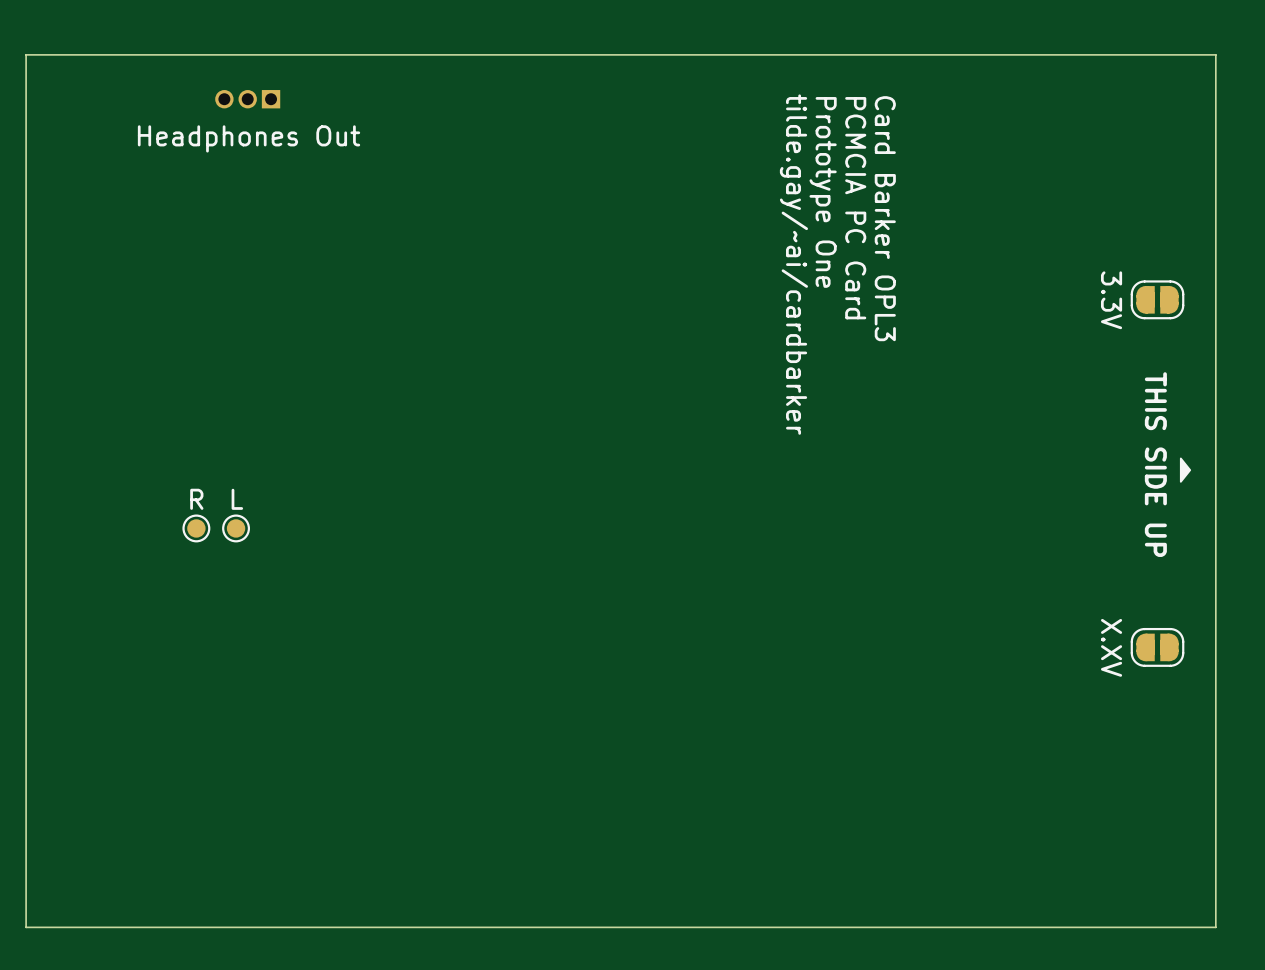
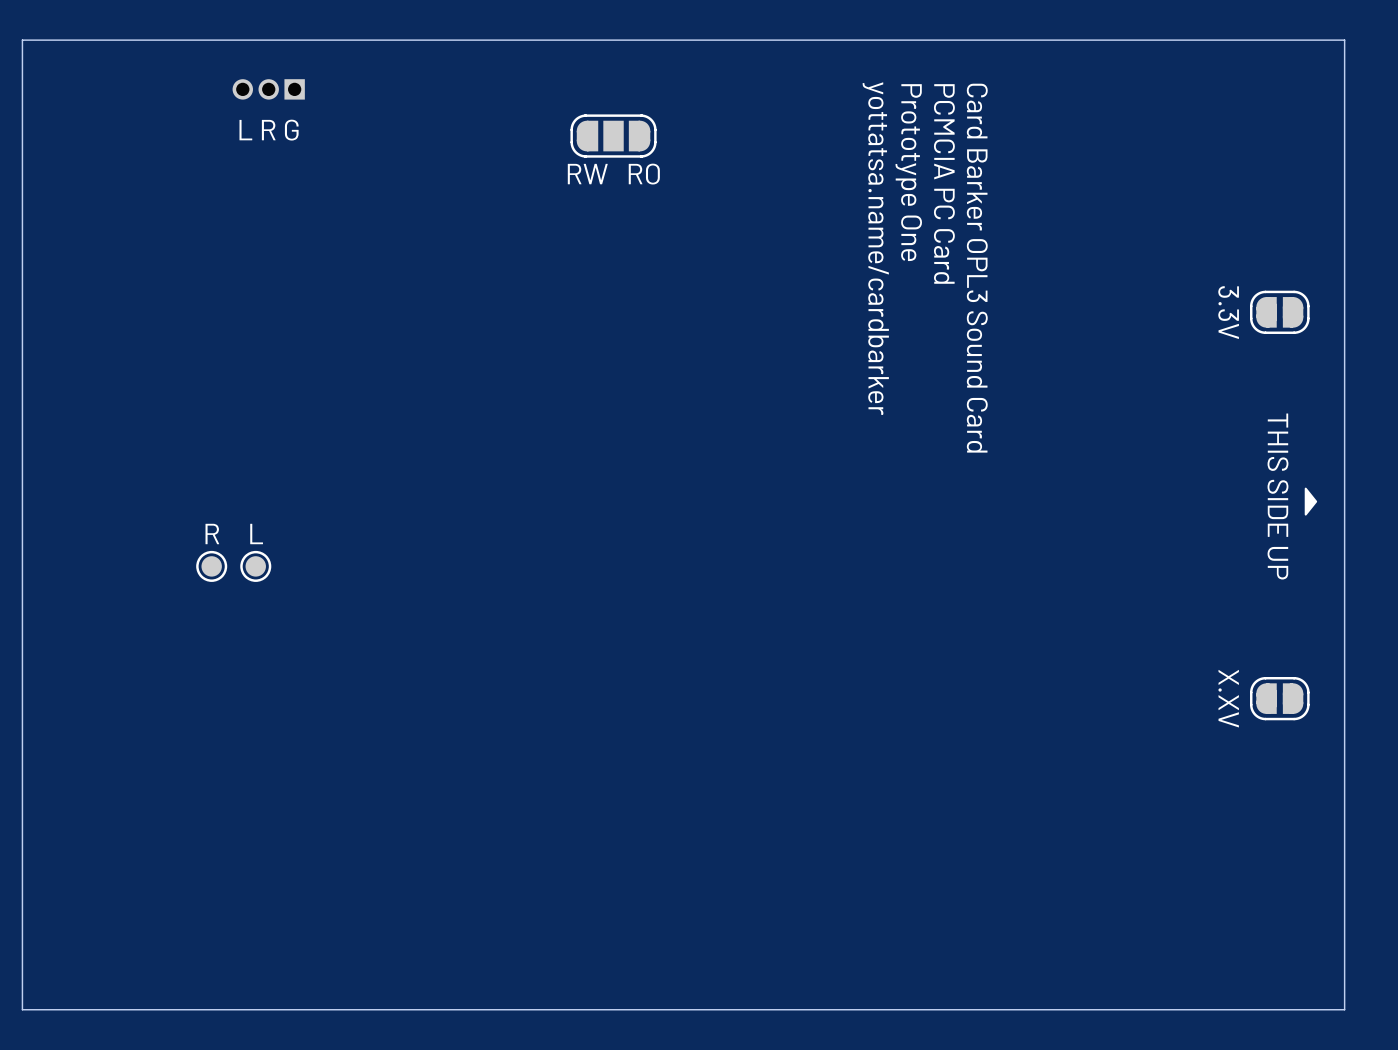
part value: Headphones Out (249, 138) -> L R G (269, 130)
part: none -> RW RO (613, 136)
text: Card Barker OPL3 (885, 218) -> Card Barker OPL3 Sound Card (977, 268)
text: tilde.gay/~ai/cardbarker (793, 264) -> yottatsa.name/cardbarker (875, 248)

